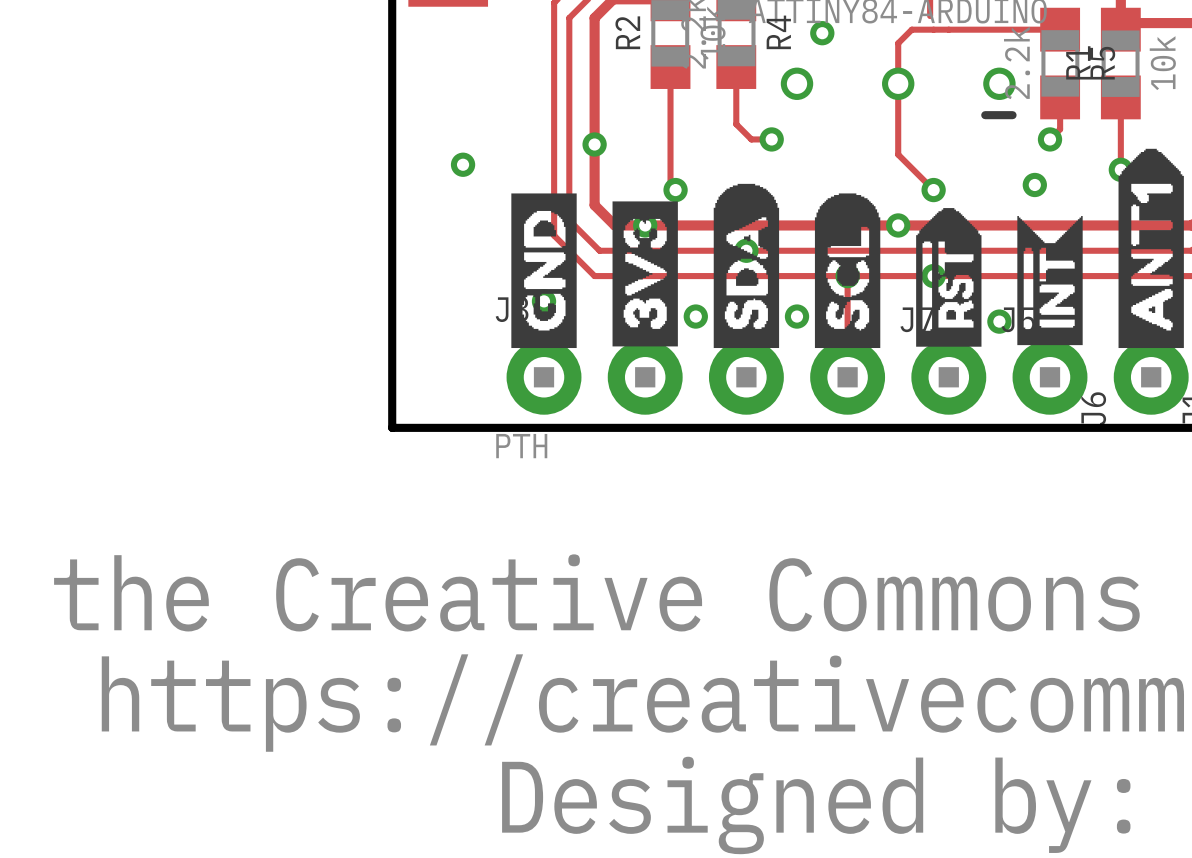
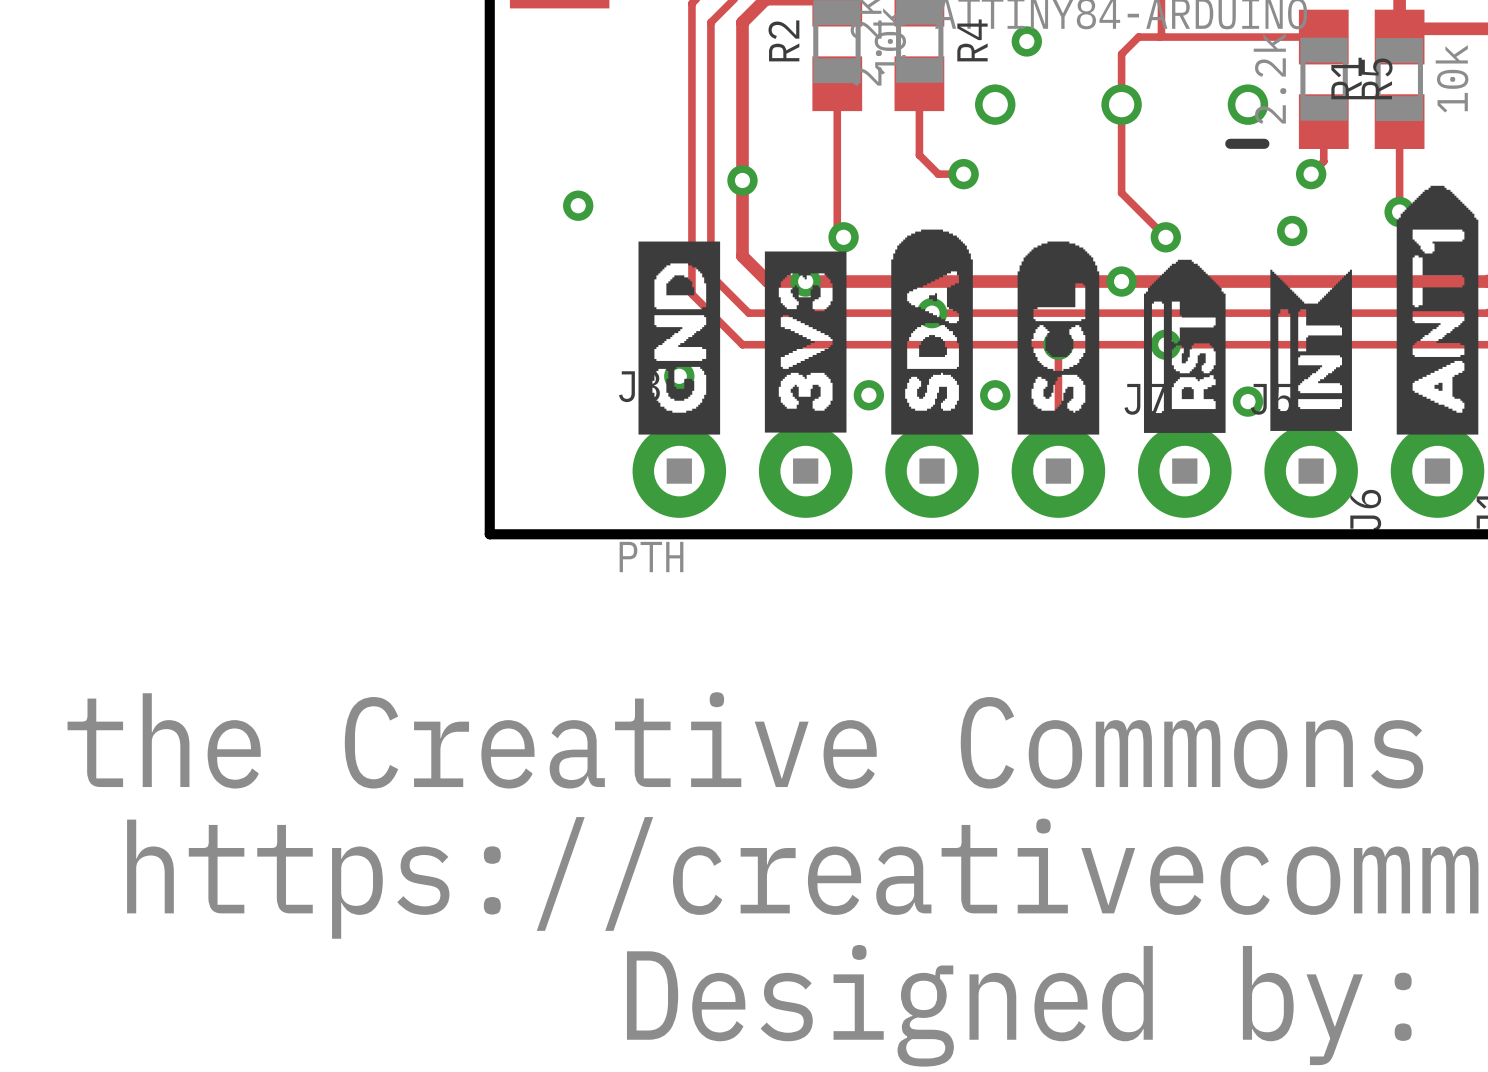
track: none -> (1161, 20) (1161, 35) (1159, 37)

